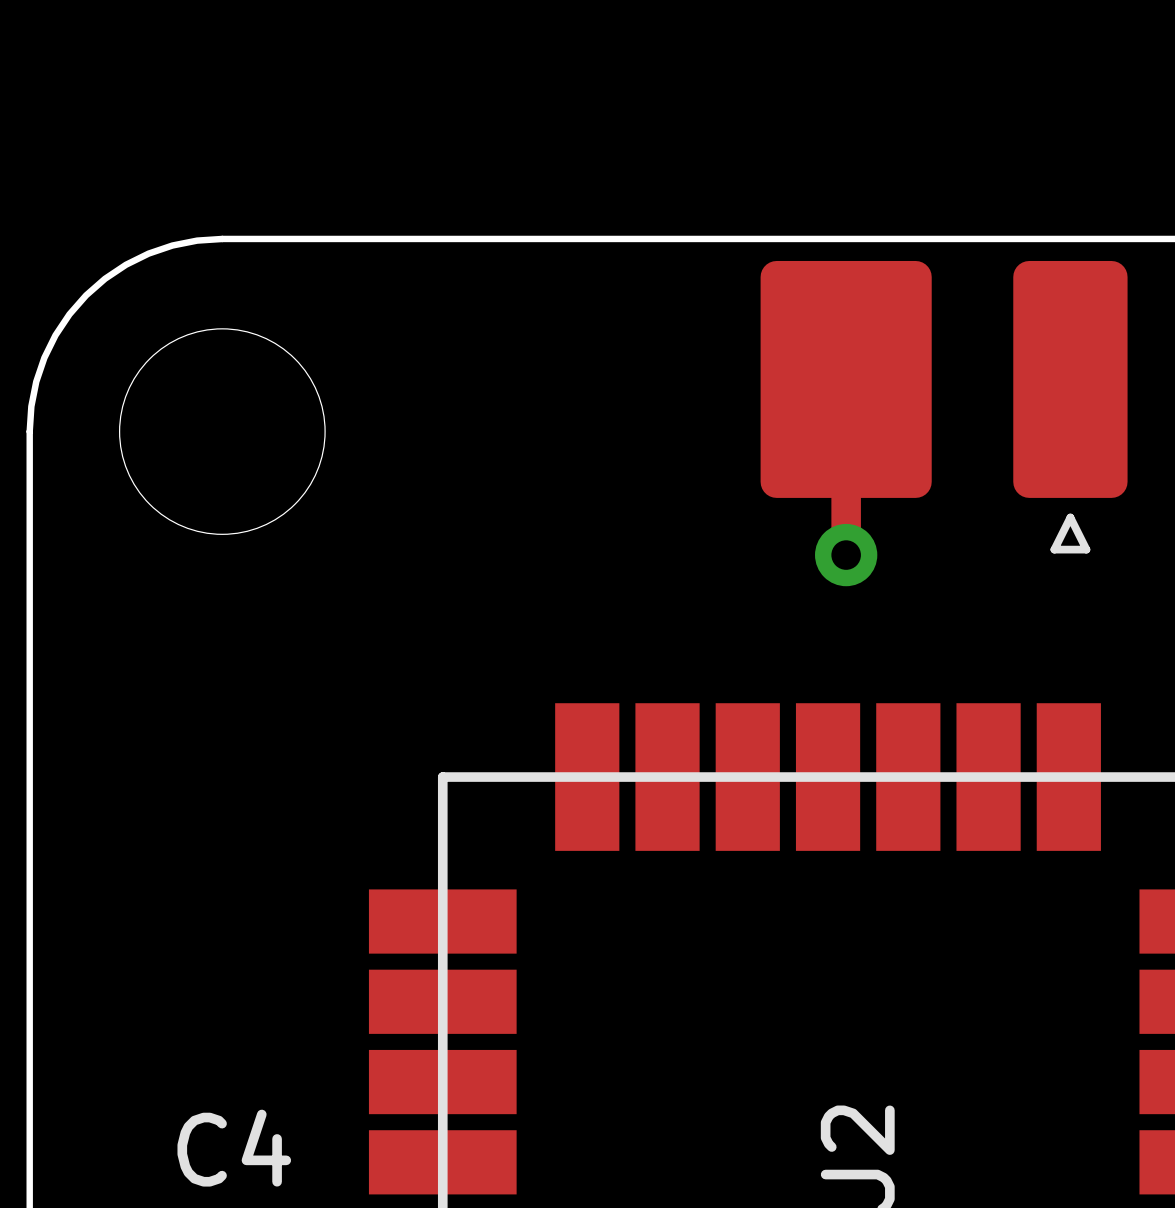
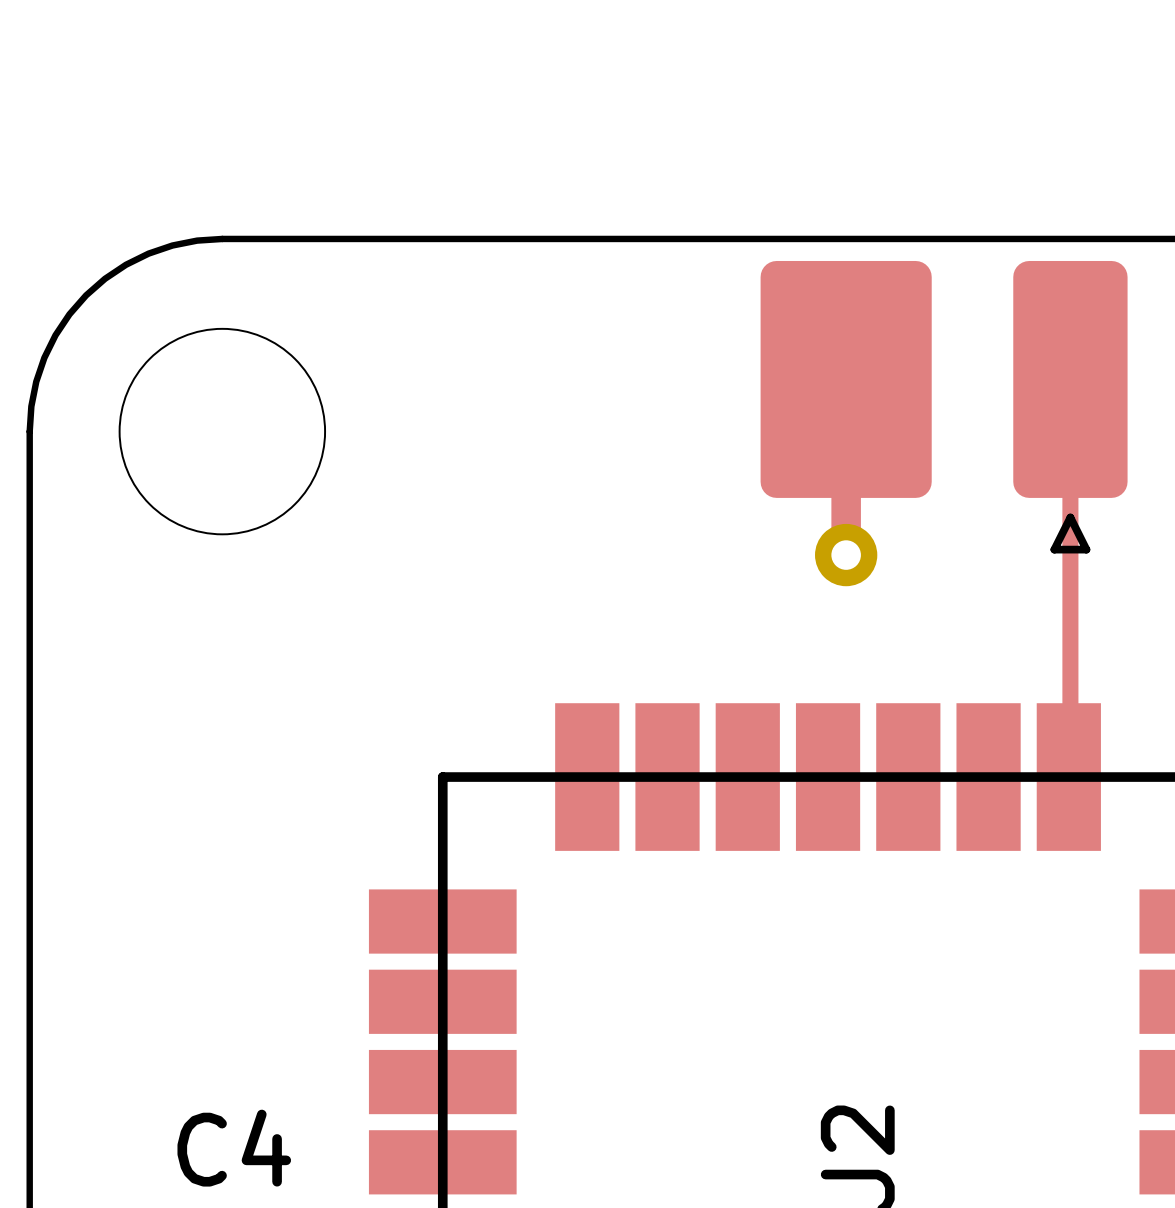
track: none -> (1070, 379) (1070, 775) (1068, 777)

